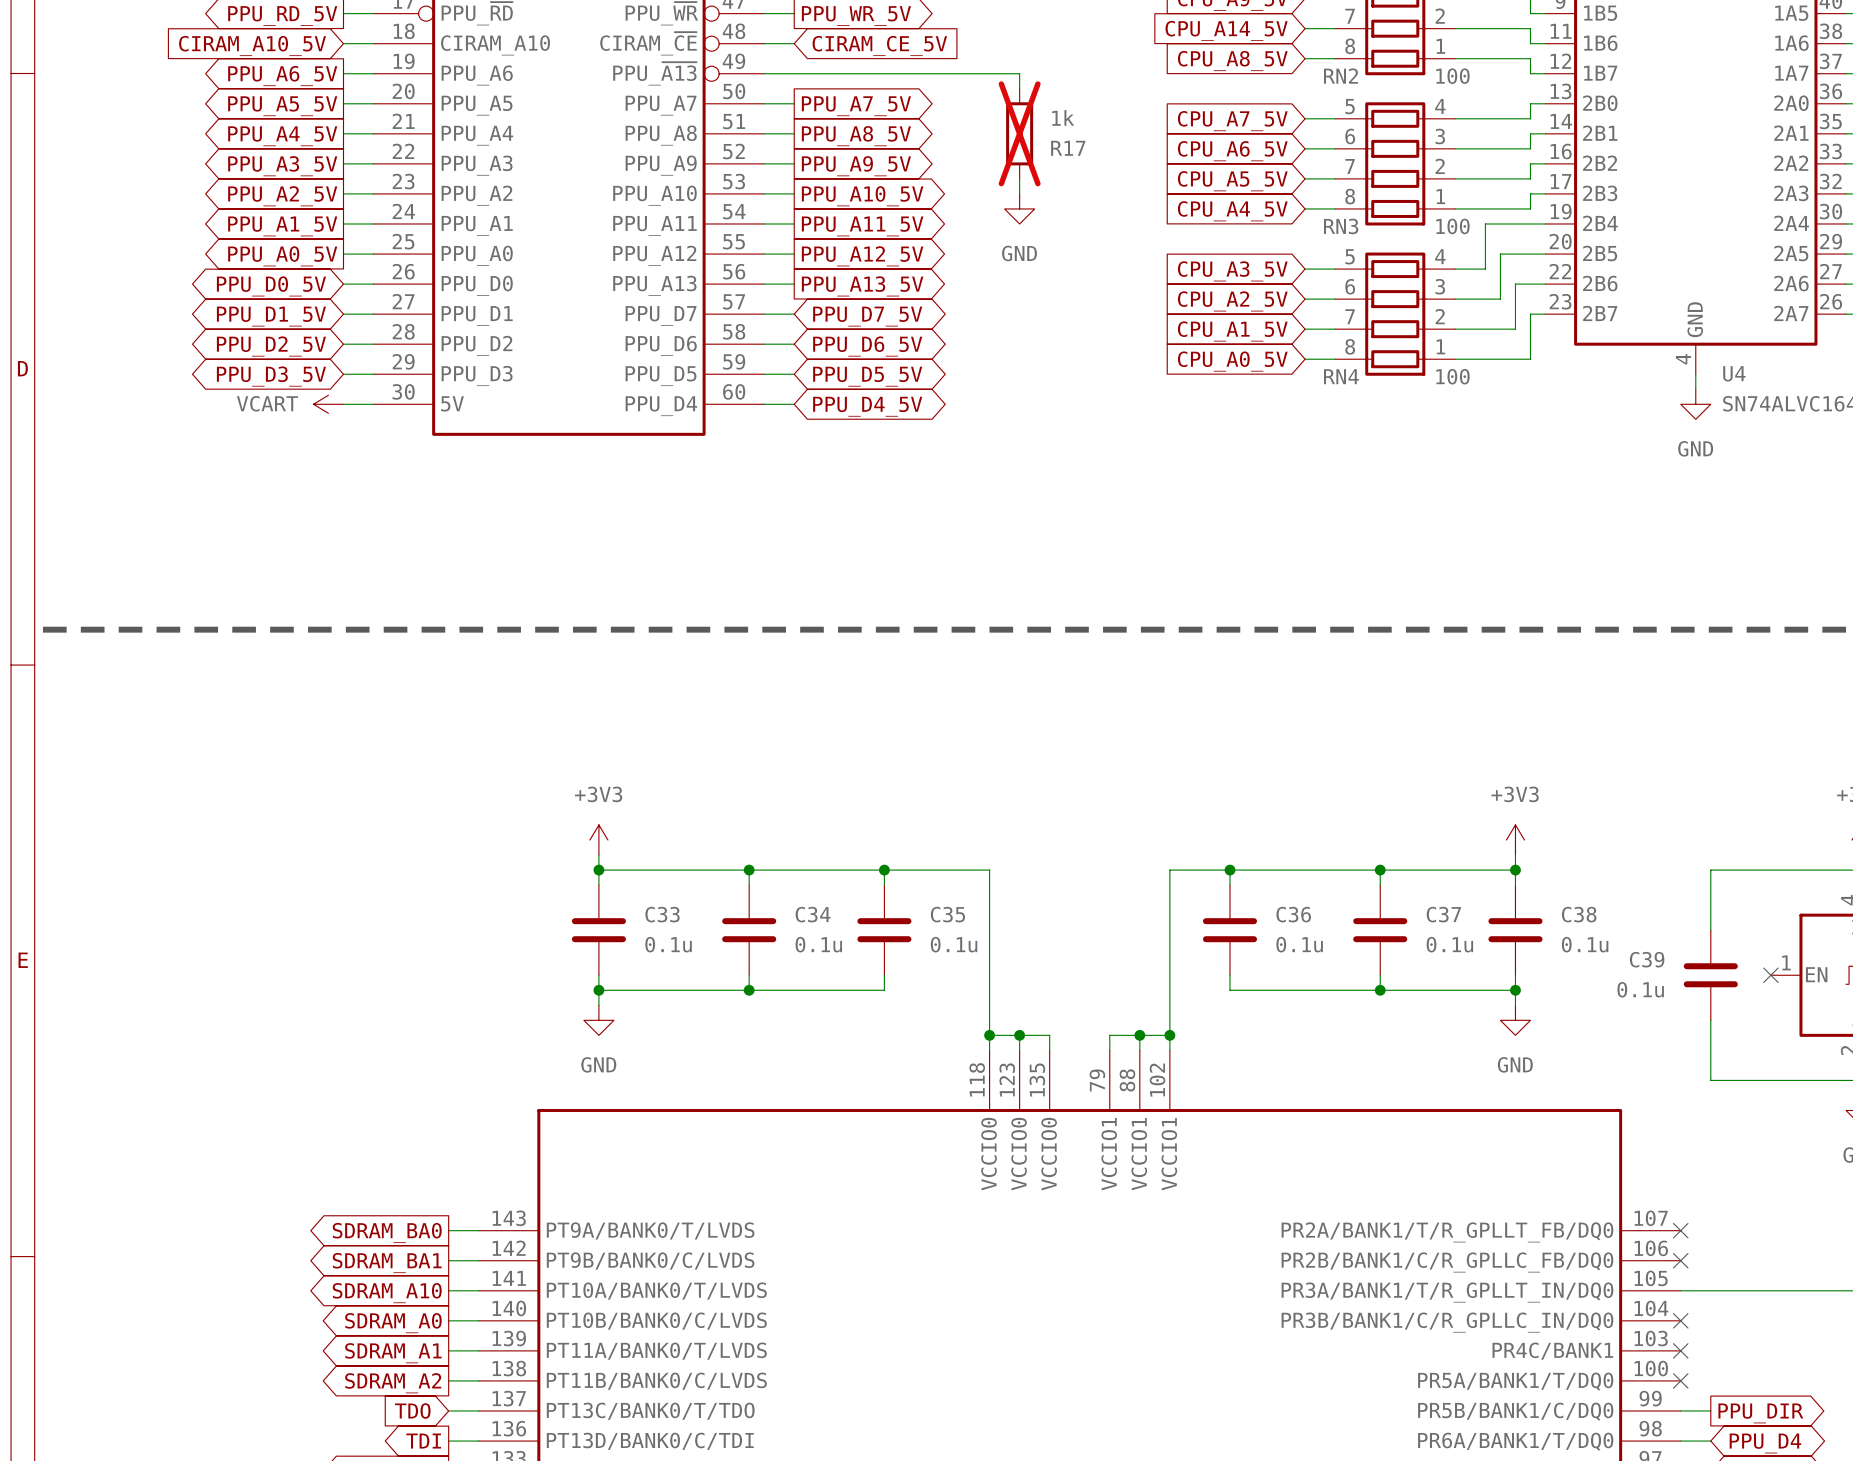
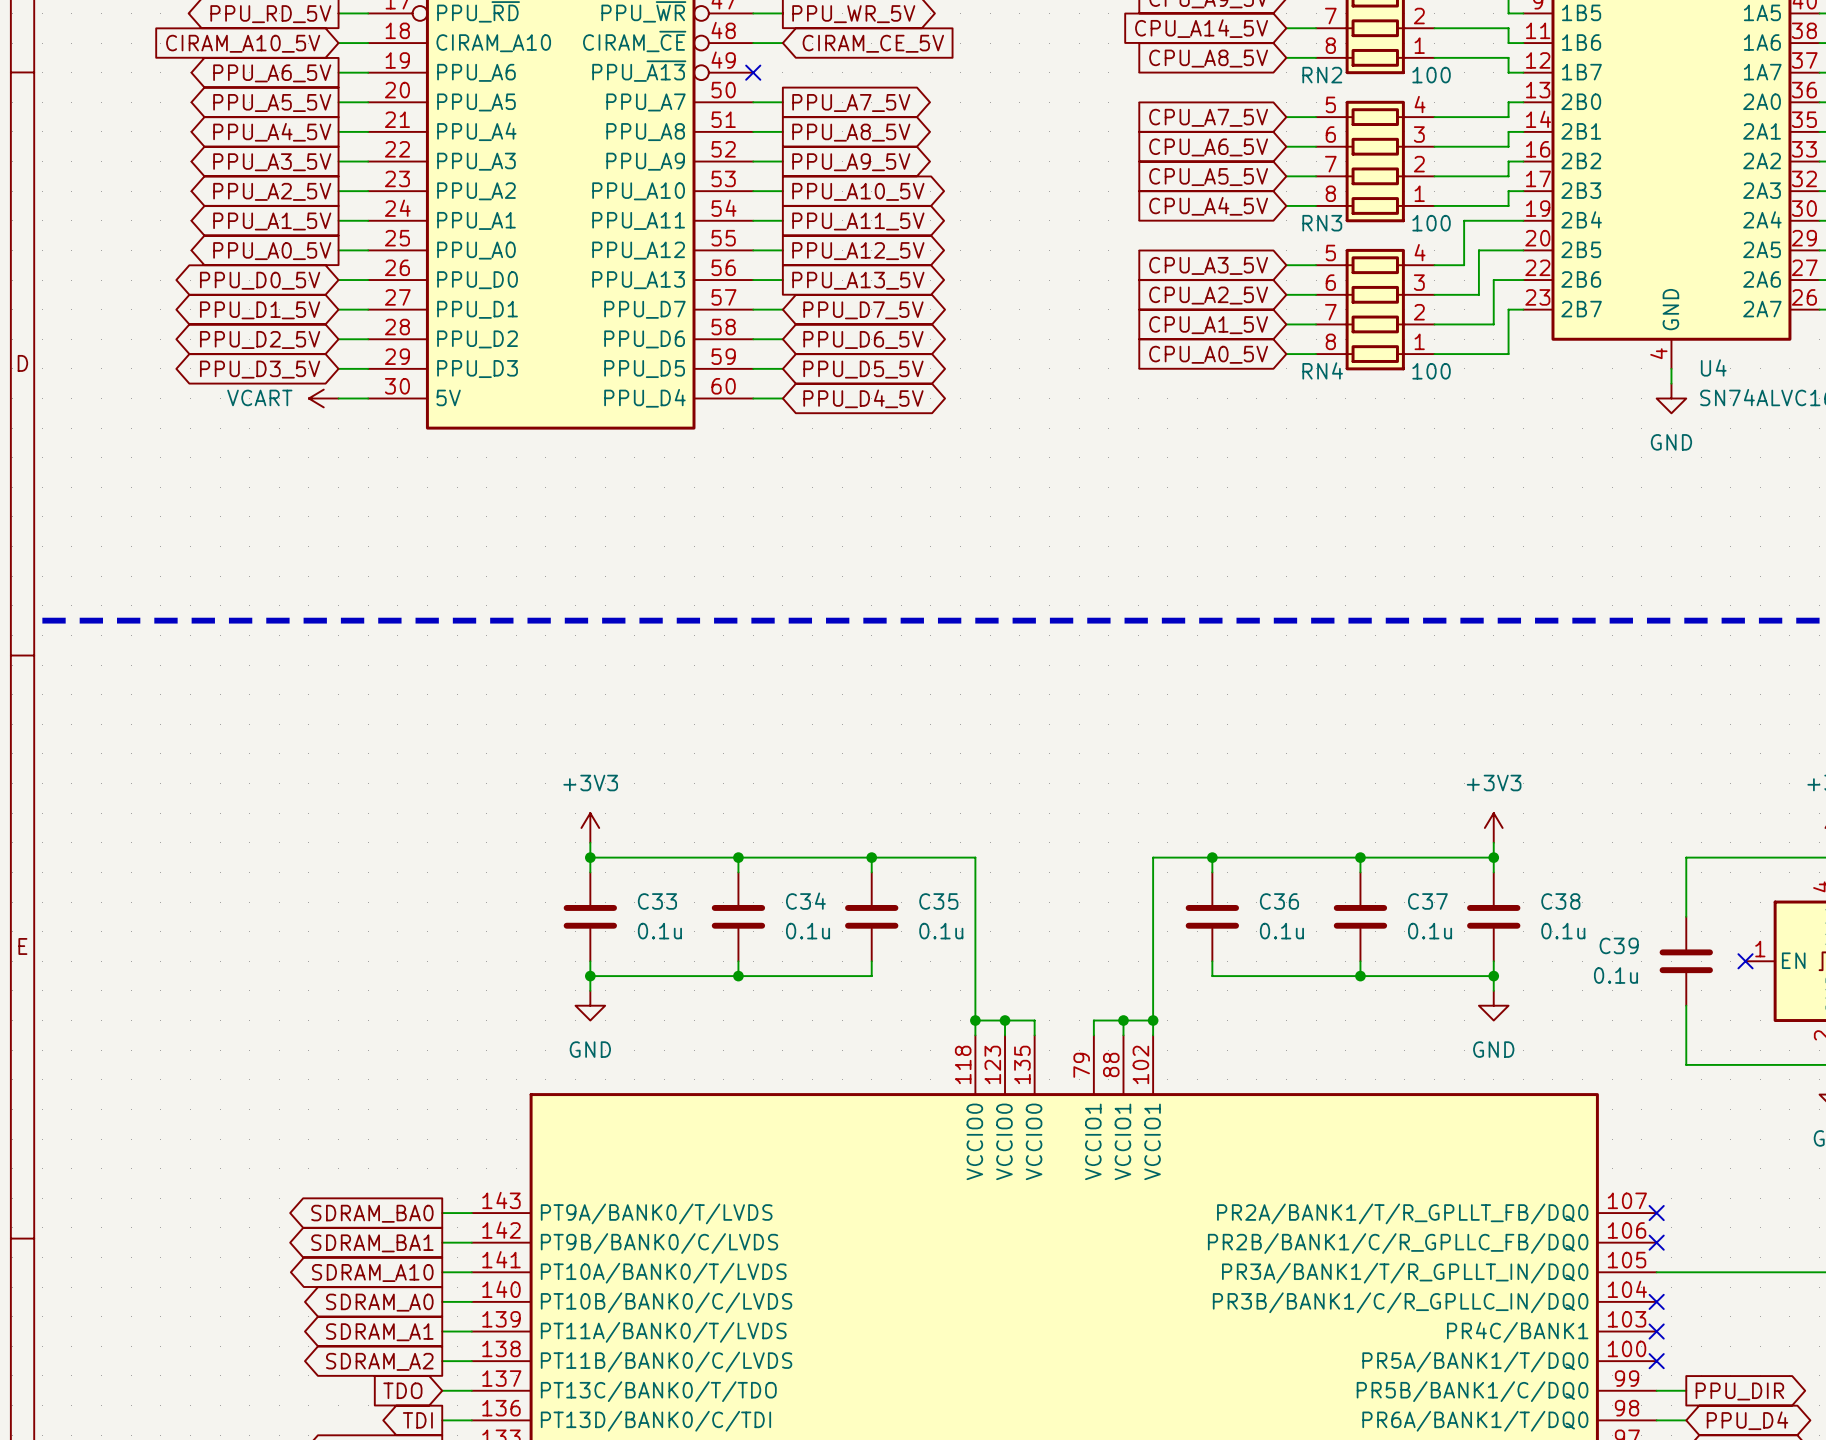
wire: (764, 73) (1019, 73) (1019, 88) -> none
no-connect mark: none -> (753, 72)
R17: 1k (1019, 133) -> none
wire: (1019, 178) (1019, 193) -> none
power symbol: GND (1019, 208) -> none

